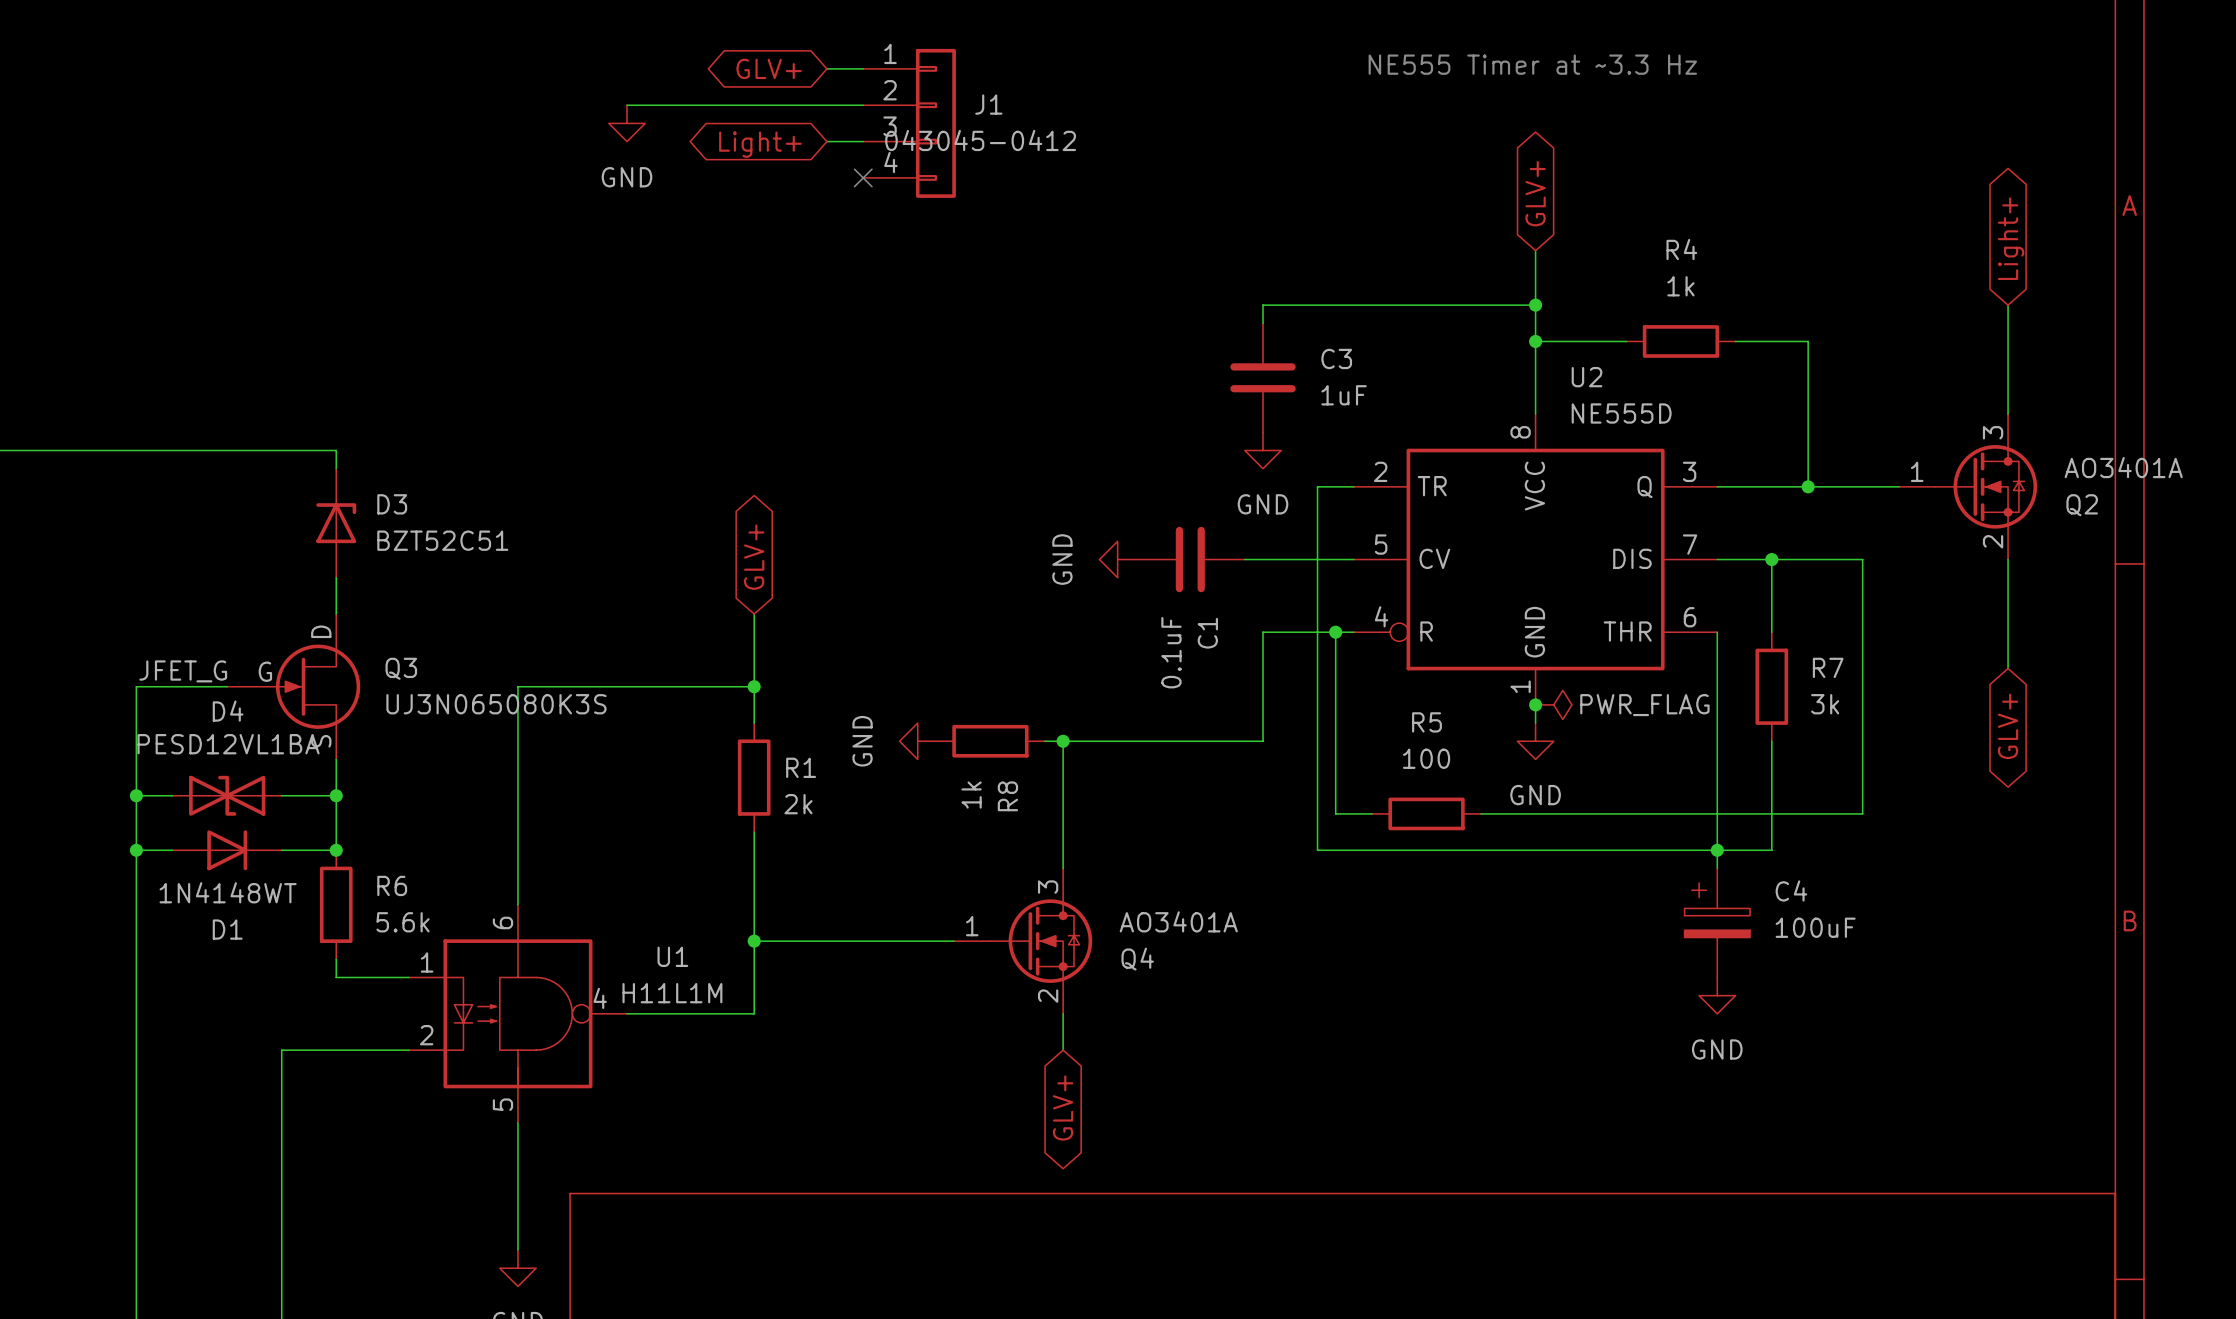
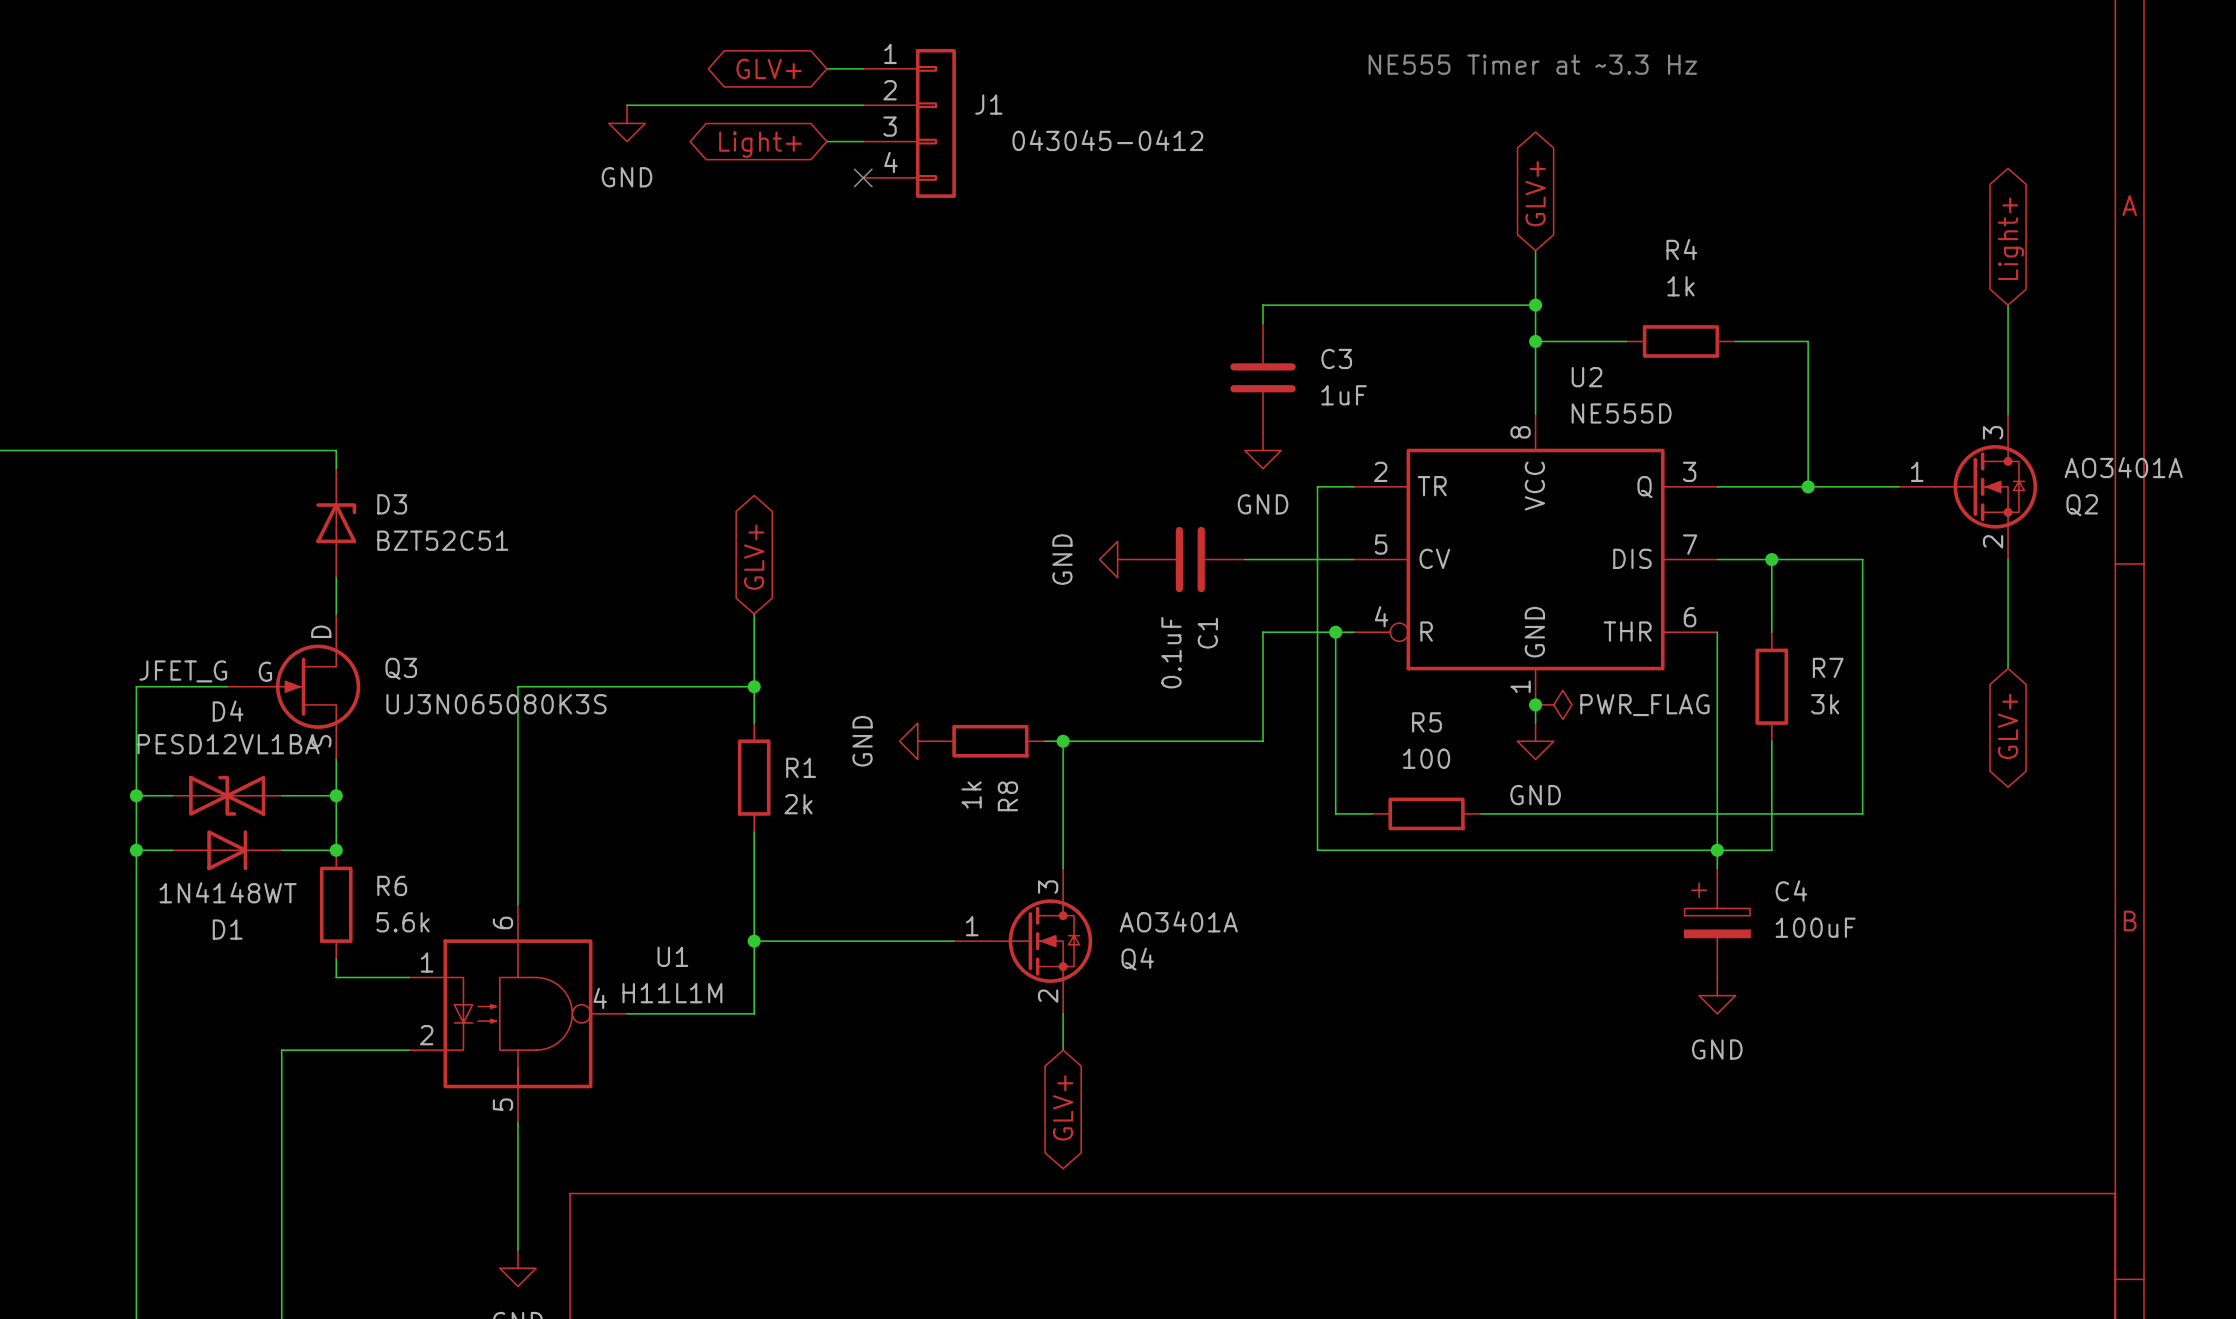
J1 value position: 043045-0412 (980, 140) -> 043045-0412 (1107, 140)

